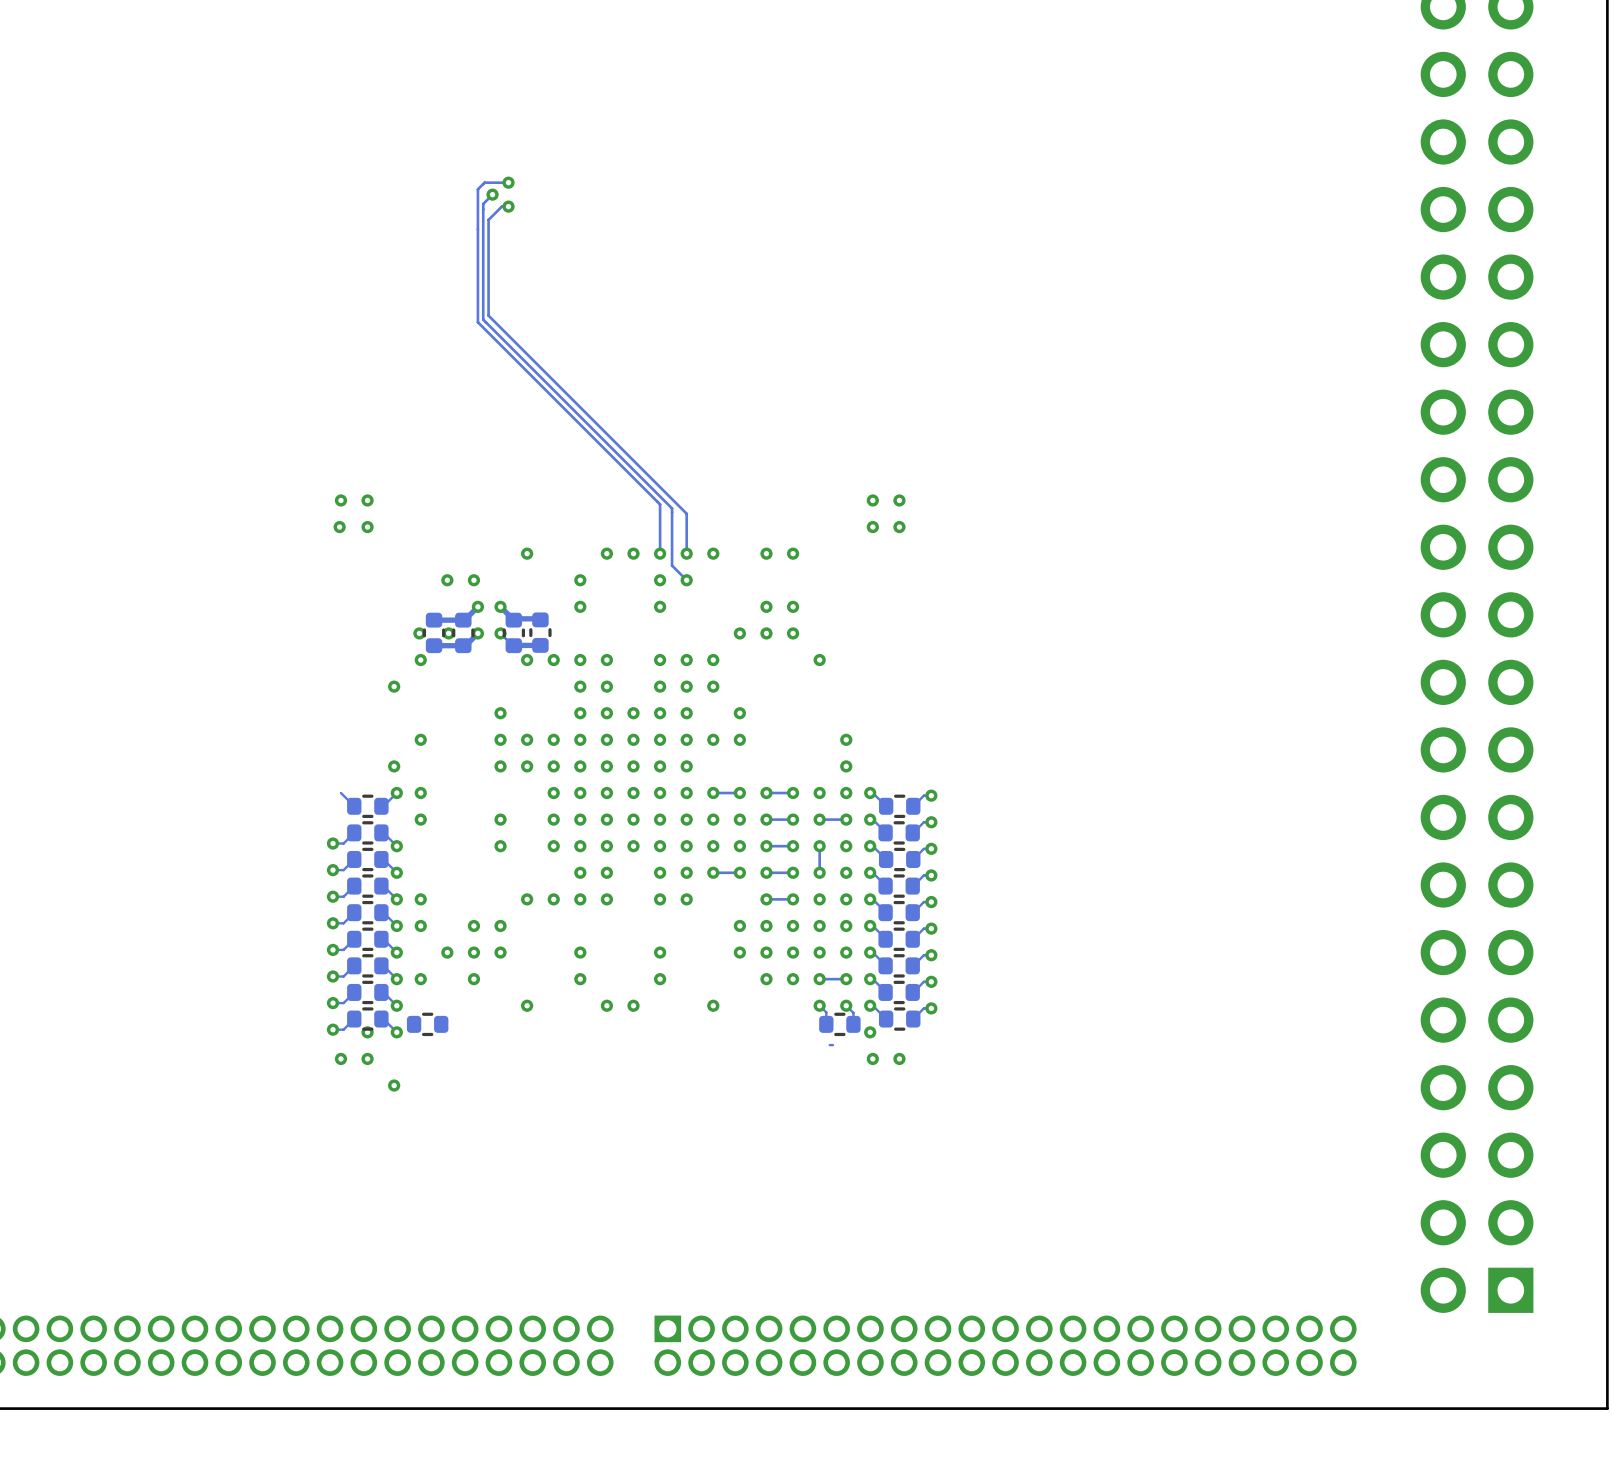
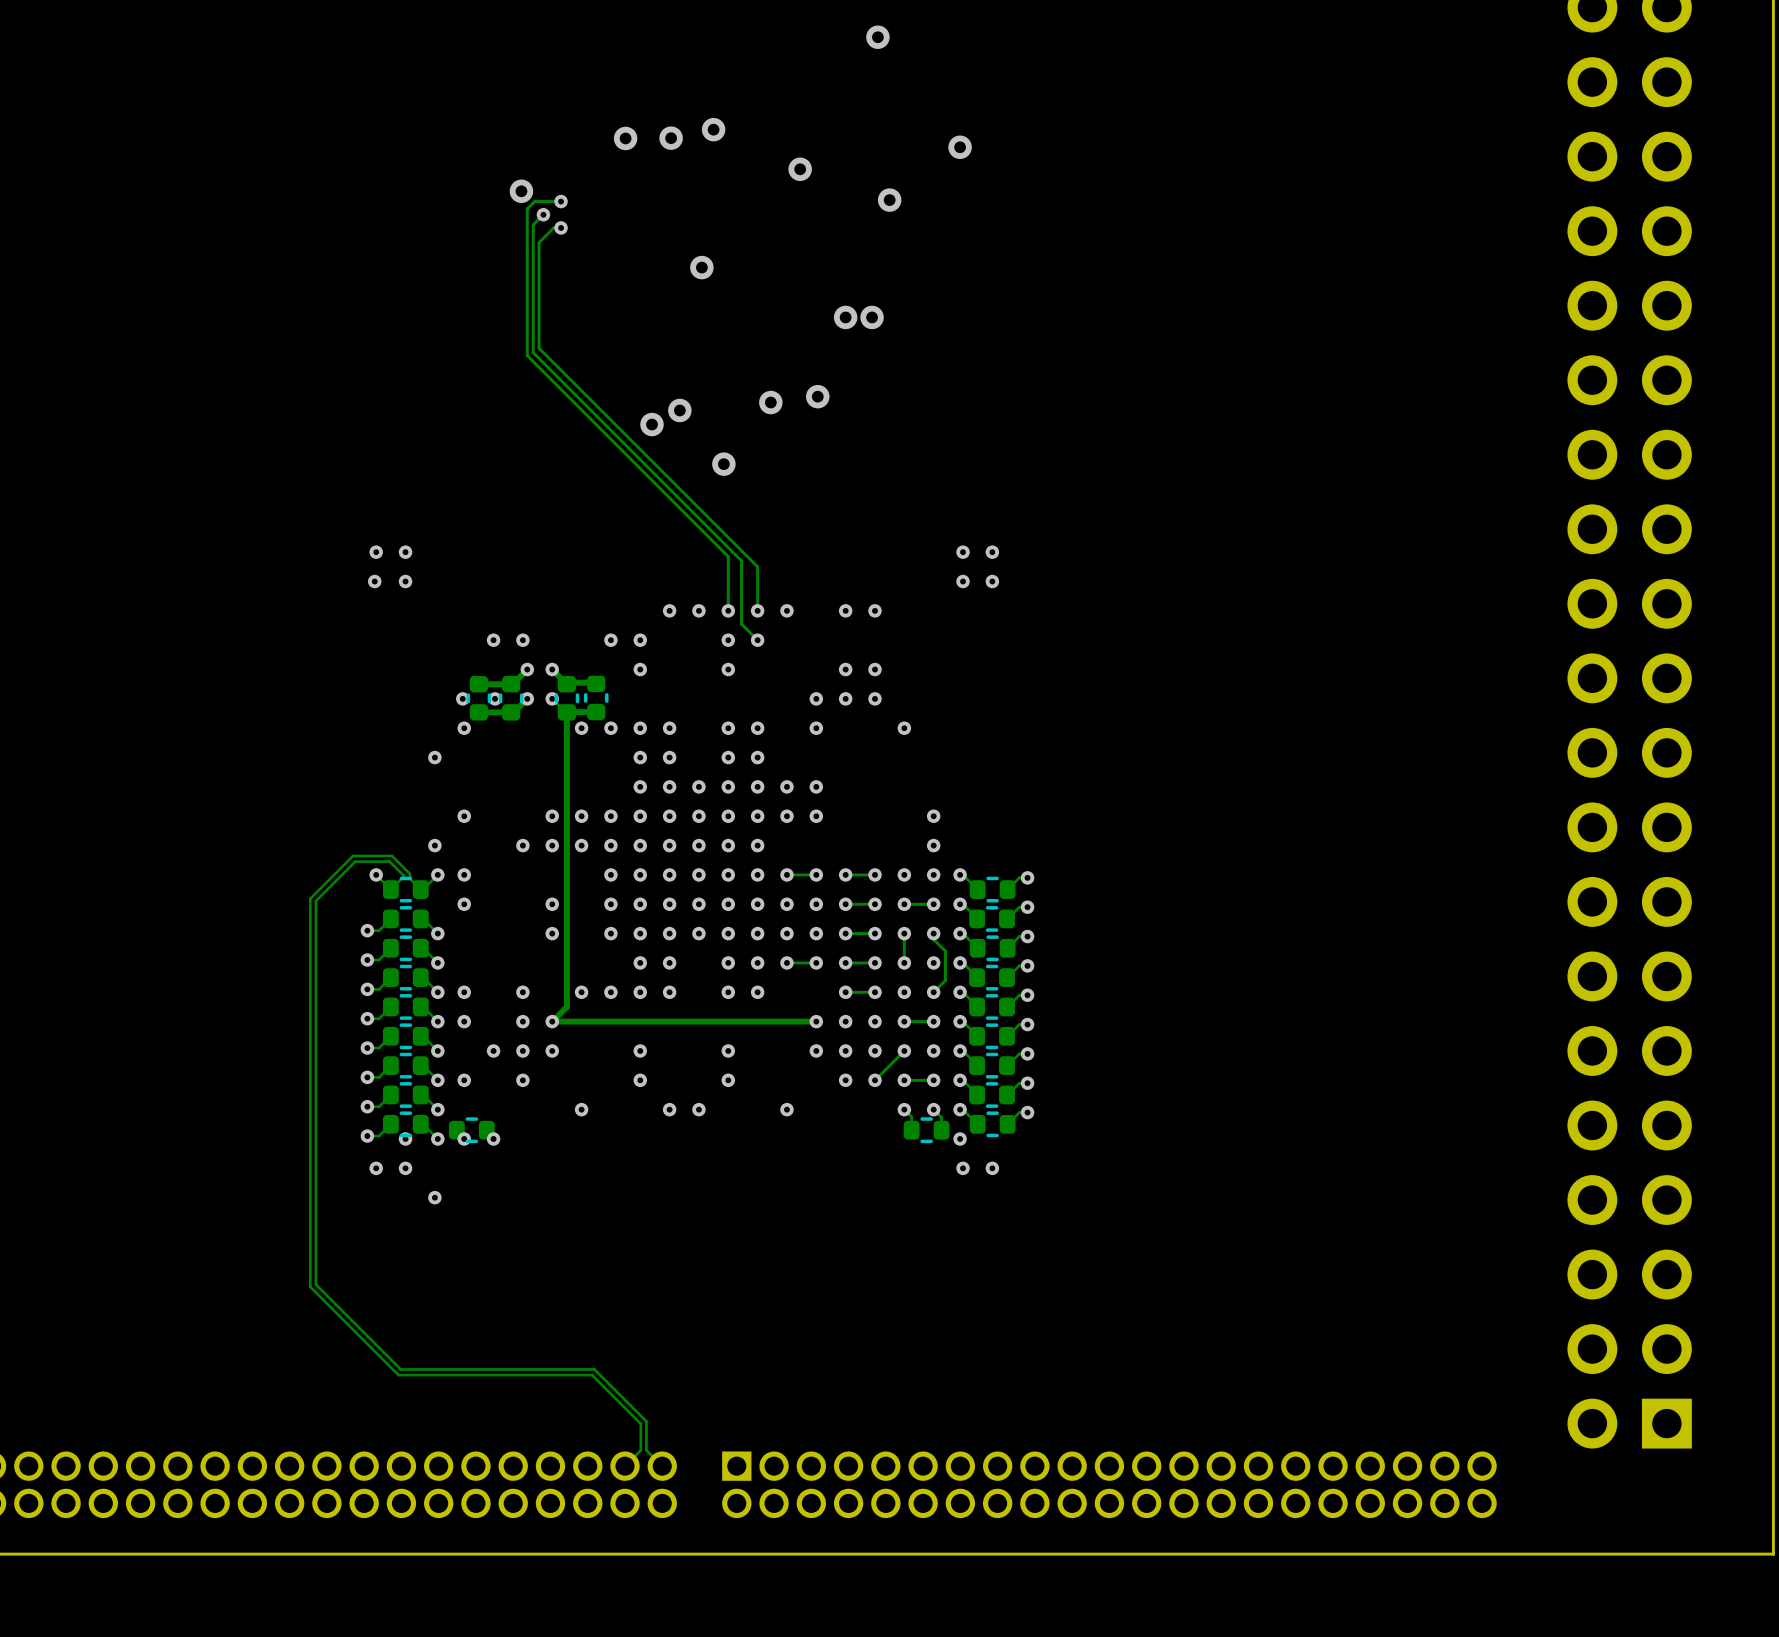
via: none -> (877, 37)
via: none -> (713, 129)
via: none -> (625, 138)
via: none -> (671, 138)
via: none -> (960, 147)
via: none -> (800, 169)
via: none -> (521, 191)
via: none -> (889, 200)
via: none -> (701, 267)
via: none -> (845, 317)
via: none -> (872, 317)
via: none -> (817, 396)
via: none -> (770, 402)
via: none -> (679, 410)
via: none -> (652, 424)
via: none -> (723, 464)
via position: (527, 553) -> (610, 640)
track: none -> (566, 712) (566, 1006) (552, 1021) (816, 1021)
via: (713, 660) -> none
via: none -> (816, 728)
via: (713, 686) -> none
via position: (500, 713) -> (522, 845)
via: none -> (786, 786)
via: none -> (376, 874)
track: none -> (390, 889) (403, 875) (389, 861) (355, 861) (315, 901) (315, 1284) (400, 1369) (594, 1369) (646, 1421) (646, 1450) (662, 1466)
track: none -> (420, 889) (409, 878) (409, 873) (392, 855) (353, 855) (310, 898) (310, 1286) (398, 1375) (592, 1375) (640, 1423) (640, 1450) (625, 1466)
track: none -> (933, 933) (933, 939) (945, 951) (945, 980) (933, 992)
via: none -> (522, 992)
track: none -> (933, 1021) (904, 1021)
track: none -> (904, 1050) (874, 1080)
via: none -> (464, 1138)
via: none -> (493, 1138)
track: (832, 1045) (829, 1045) -> none

